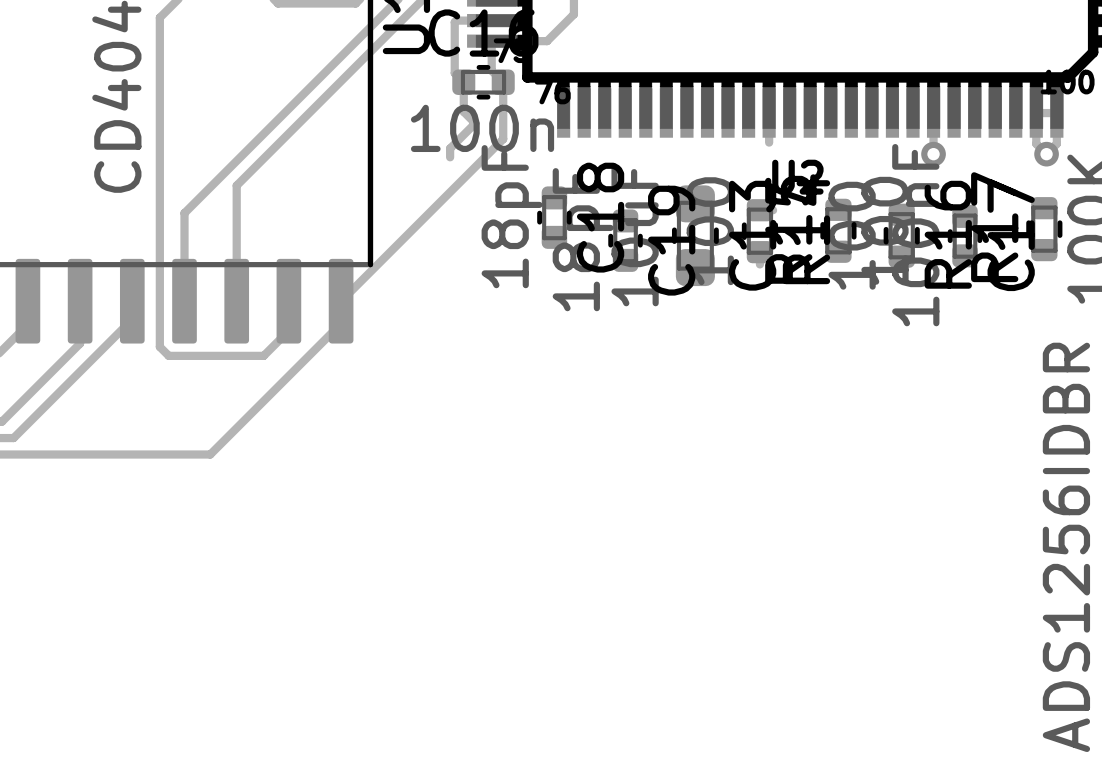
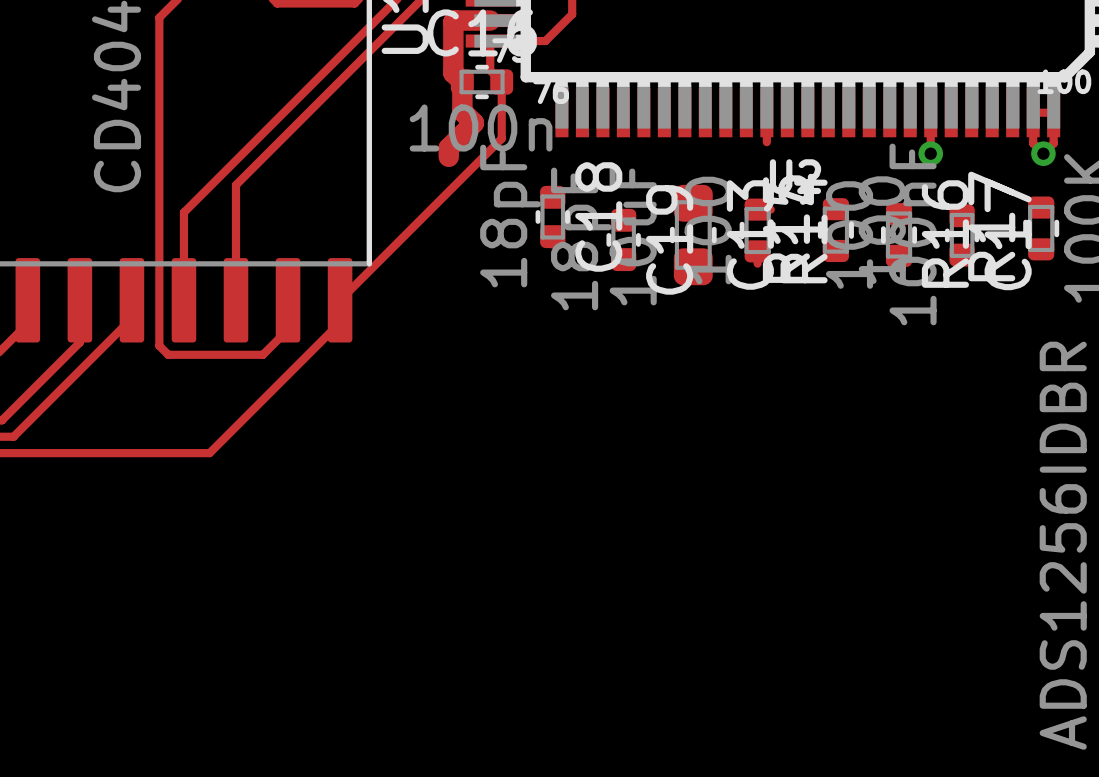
track width: thin (491, 20) (456, 20) (454, 22) (454, 73) (463, 82) (463, 111) (475, 123) (450, 148) (450, 157) -> thick (490, 20) (455, 20) (453, 22) (453, 72) (462, 81) (462, 111) (473, 122) (448, 148) (448, 156)

